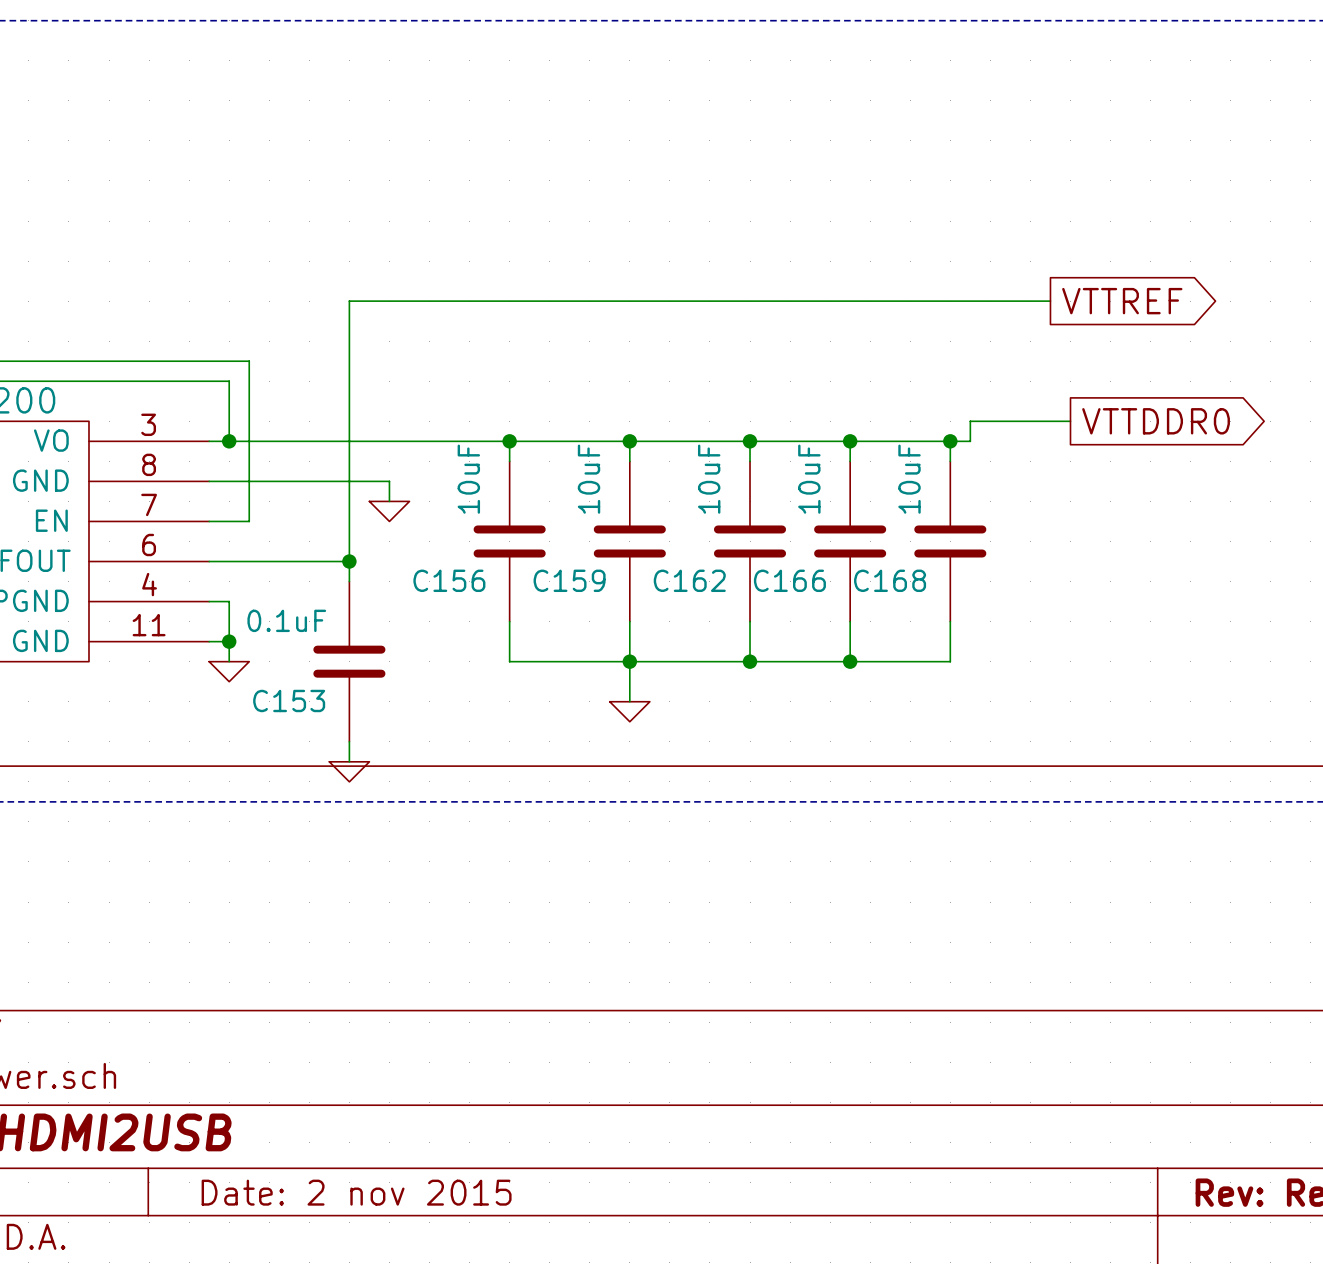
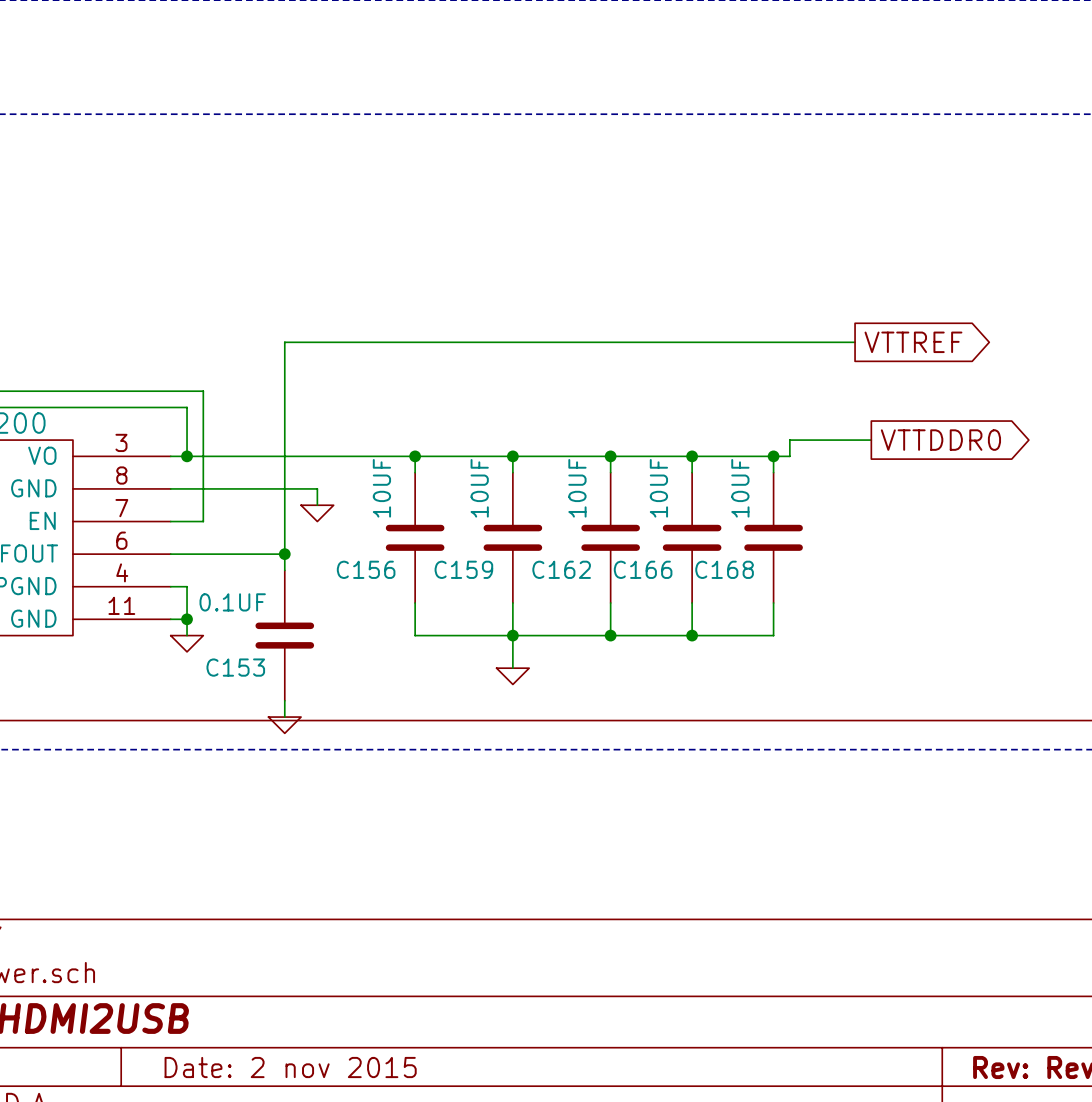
C156 value: 10uF (468, 479) -> 10UF (381, 488)
C159 value: 10uF (589, 479) -> 10UF (479, 488)
C162 value: 10uF (709, 479) -> 10UF (577, 488)
C166 value: 10uF (809, 479) -> 10UF (658, 488)
C168 value: 10uF (909, 479) -> 10UF (740, 488)
C153 value: 0.1uF (286, 620) -> 0.1UF (232, 602)

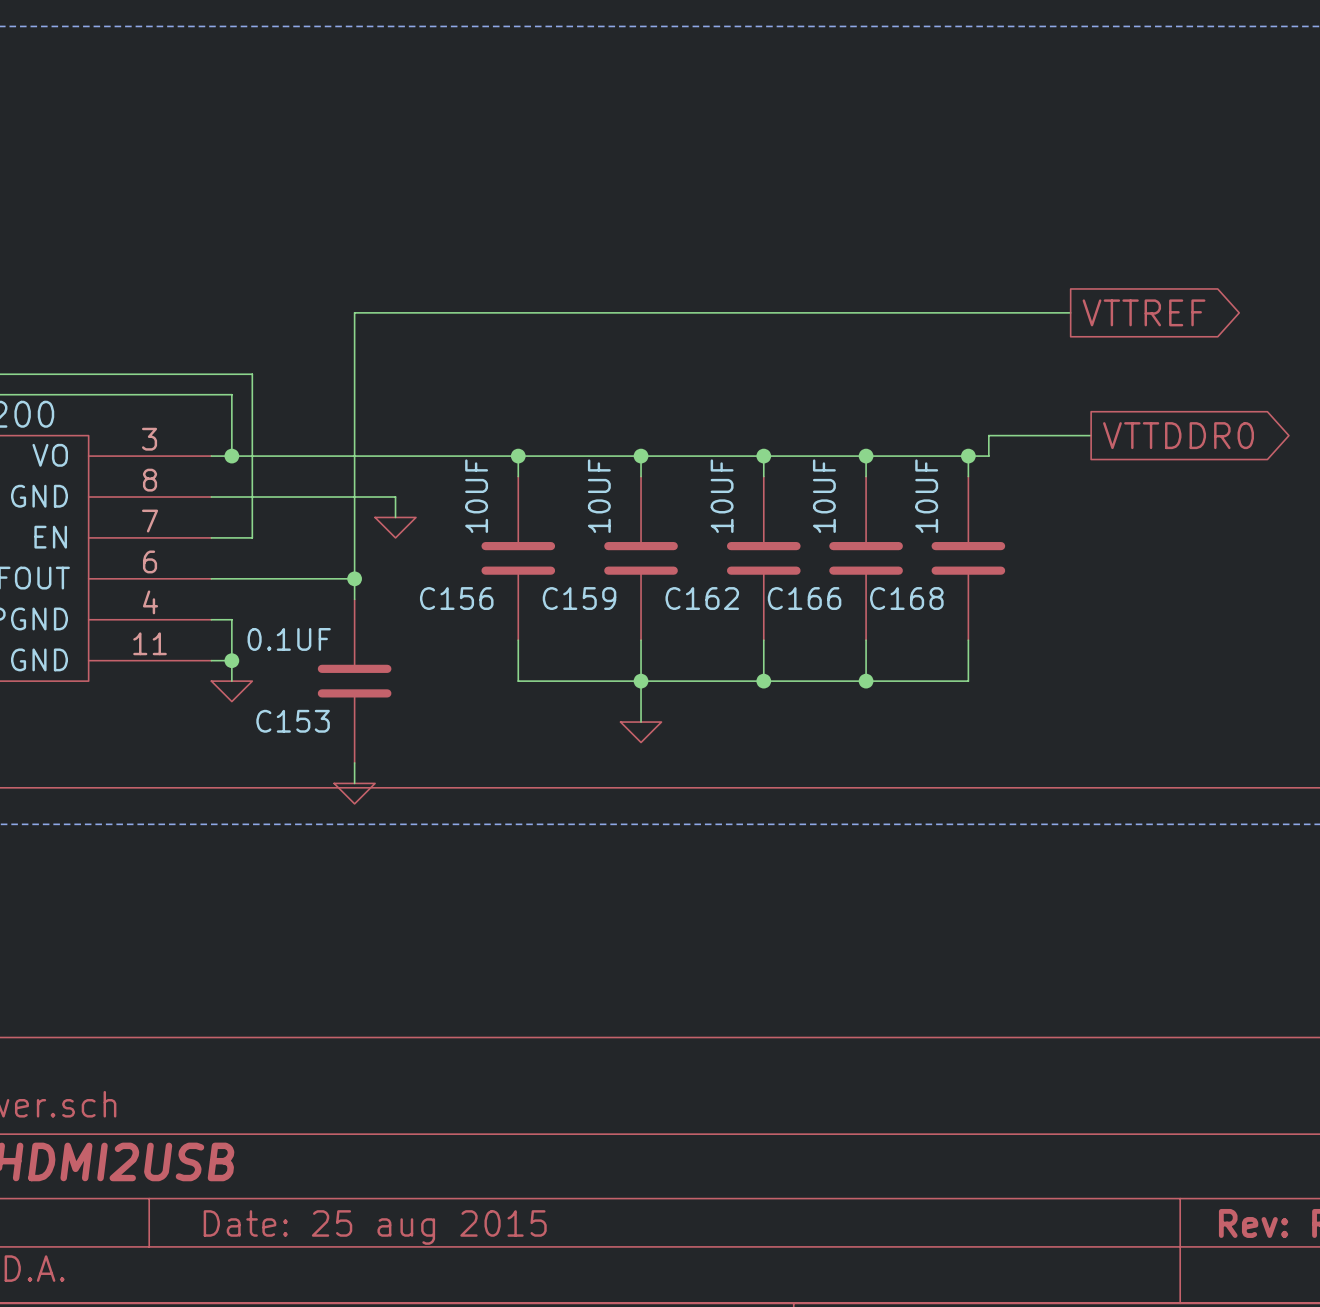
title block: Date: 2 nov 2015 (290, 1067) -> Date: 25 aug 2015 (375, 1227)

